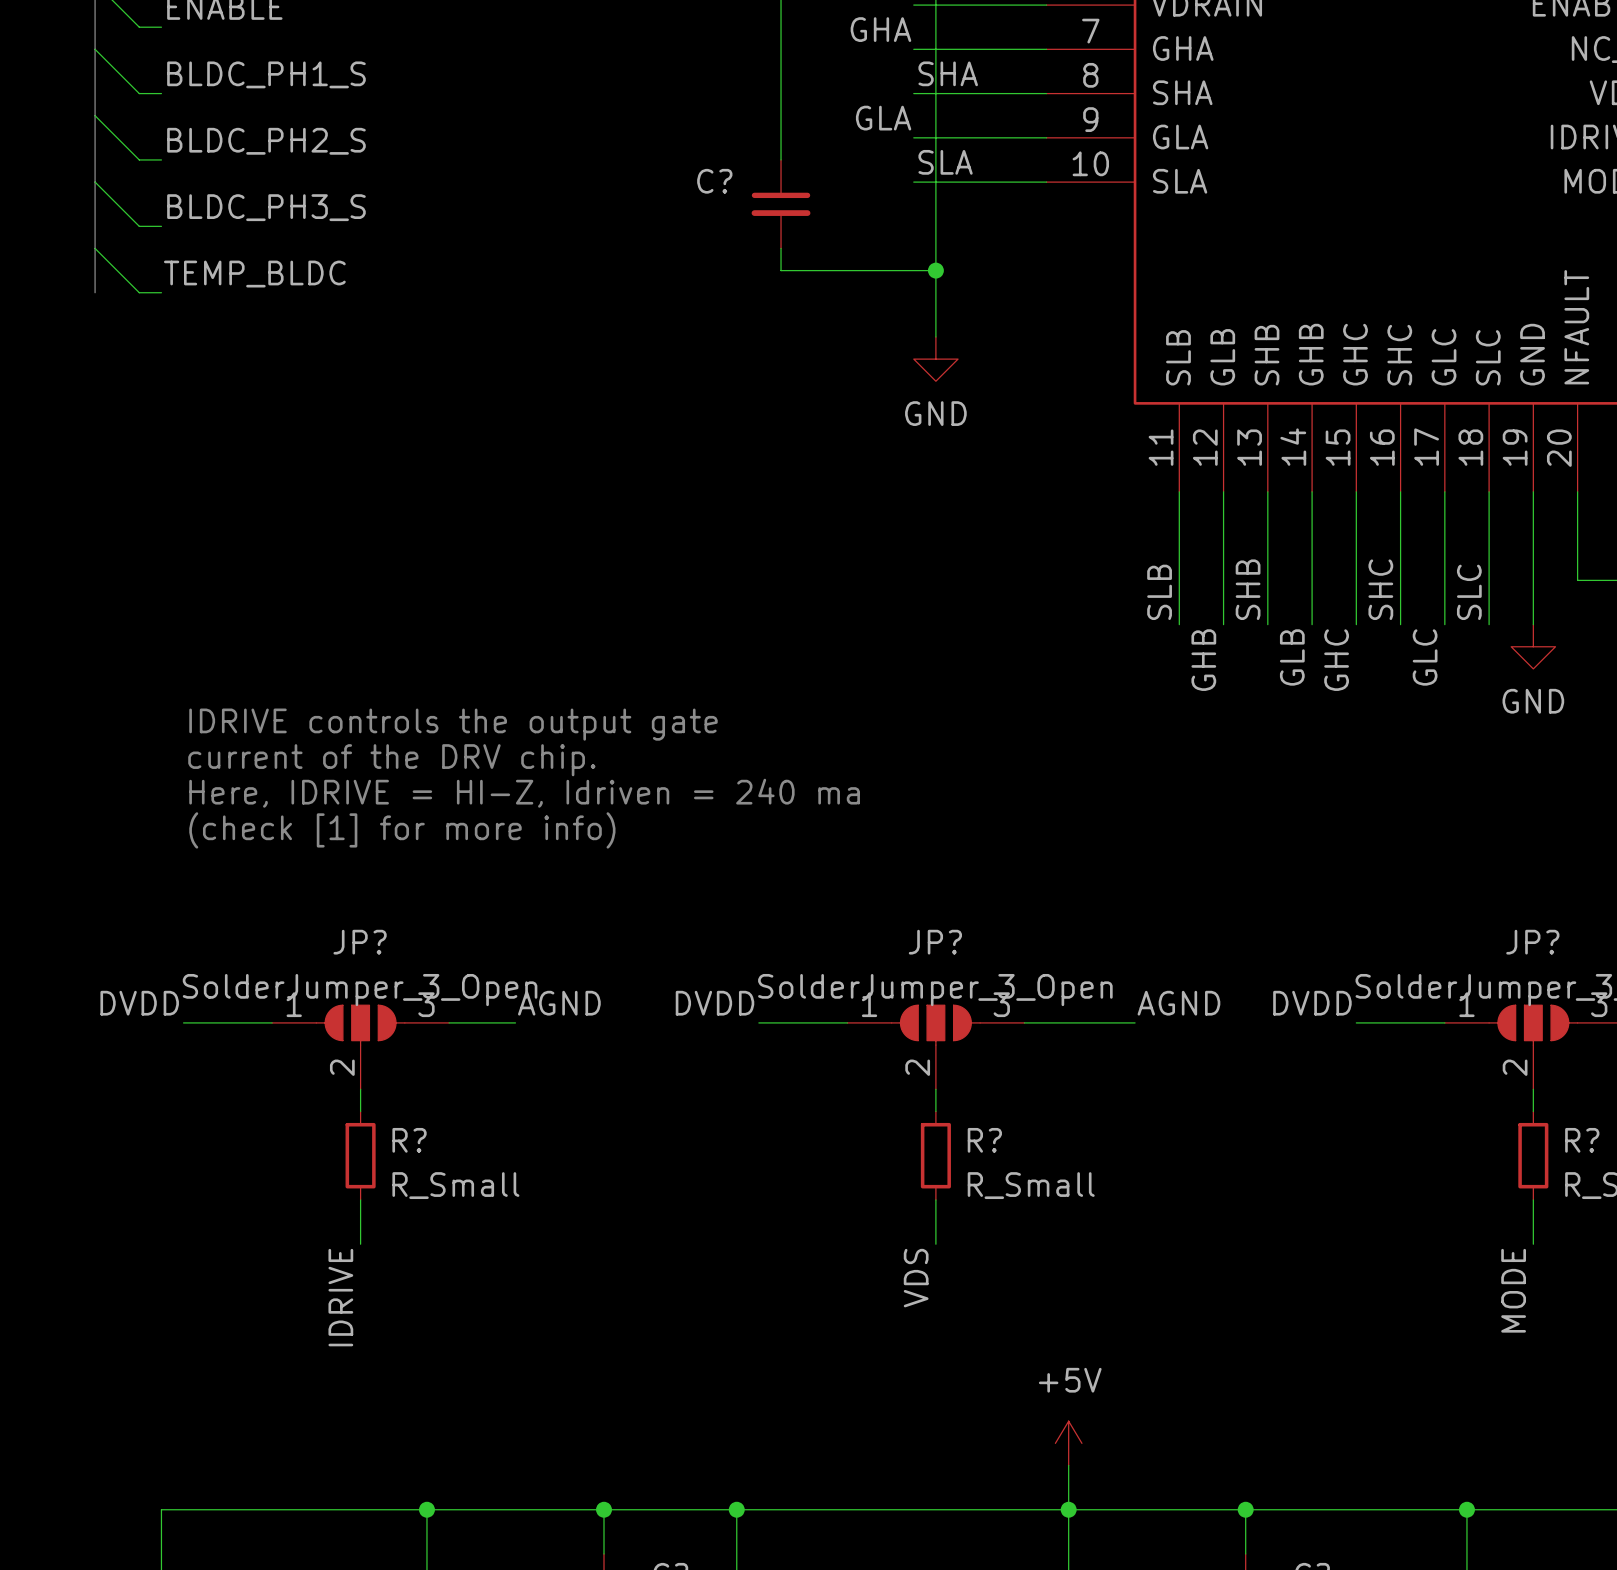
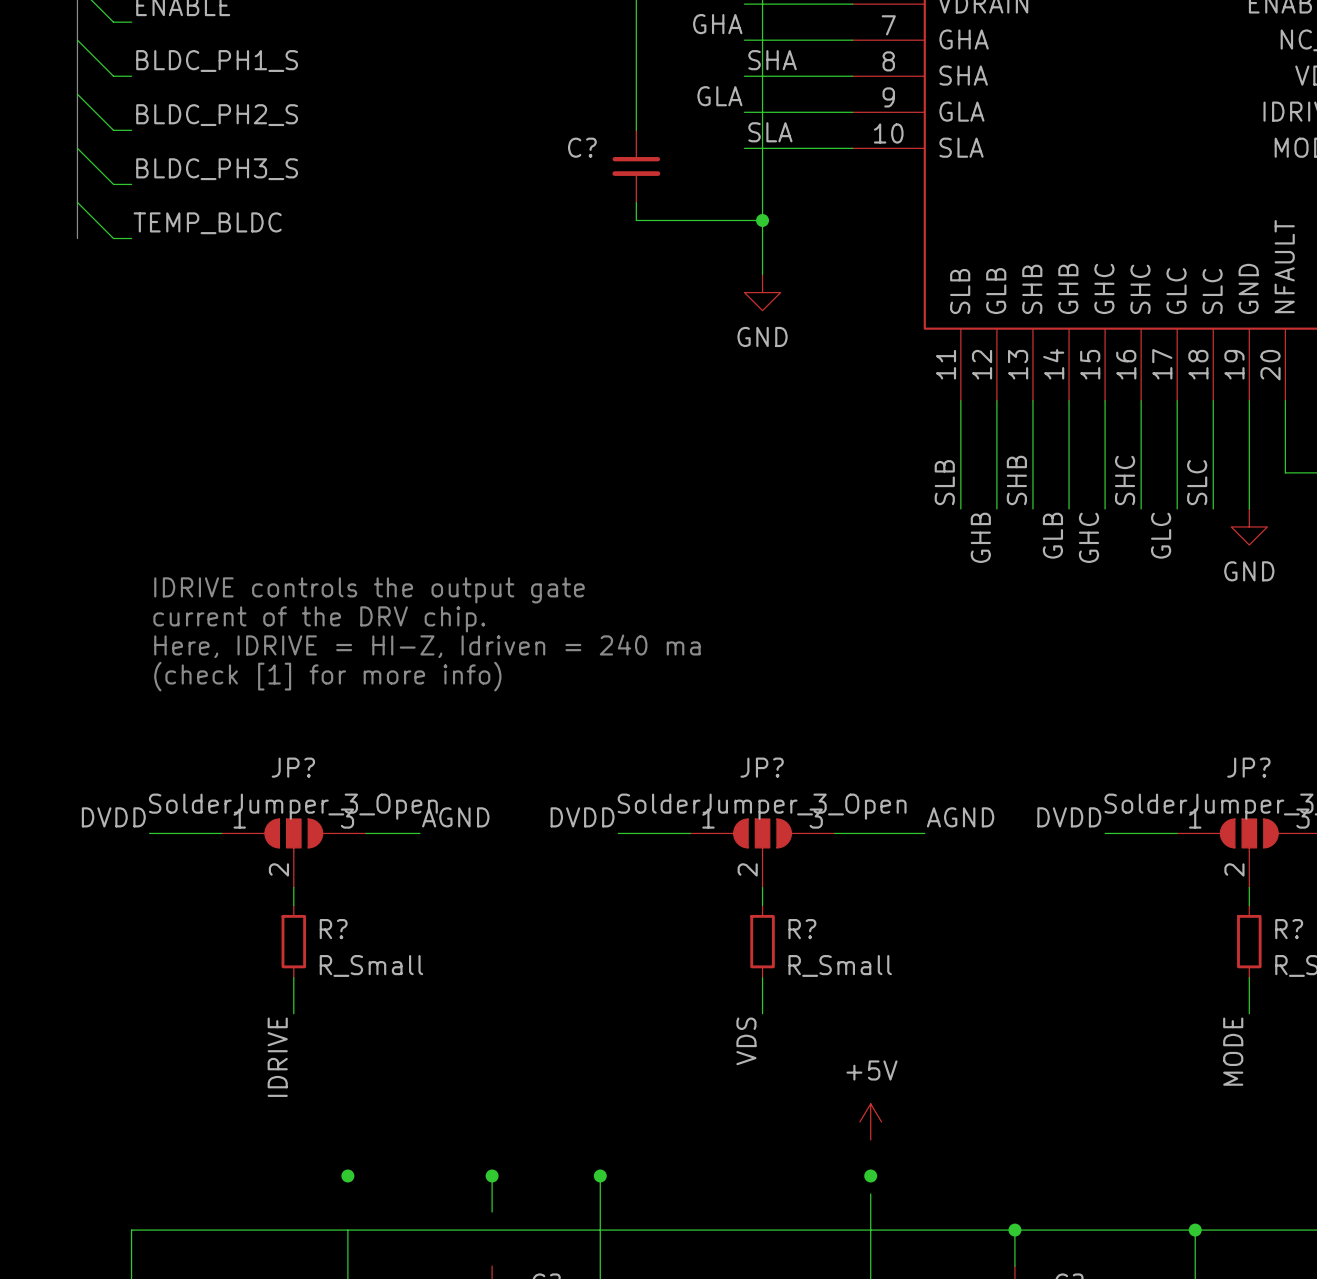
wire: none -> (600, 1175) (600, 1230)
power symbol position: +5V (1068, 1443) -> +5V (870, 1121)
junction position: (426, 1509) -> (347, 1175)
wire: (604, 1509) (604, 1554) -> (492, 1175) (492, 1212)
junction position: (604, 1509) -> (492, 1175)
junction position: (736, 1509) -> (600, 1175)
junction position: (1068, 1509) -> (870, 1175)

